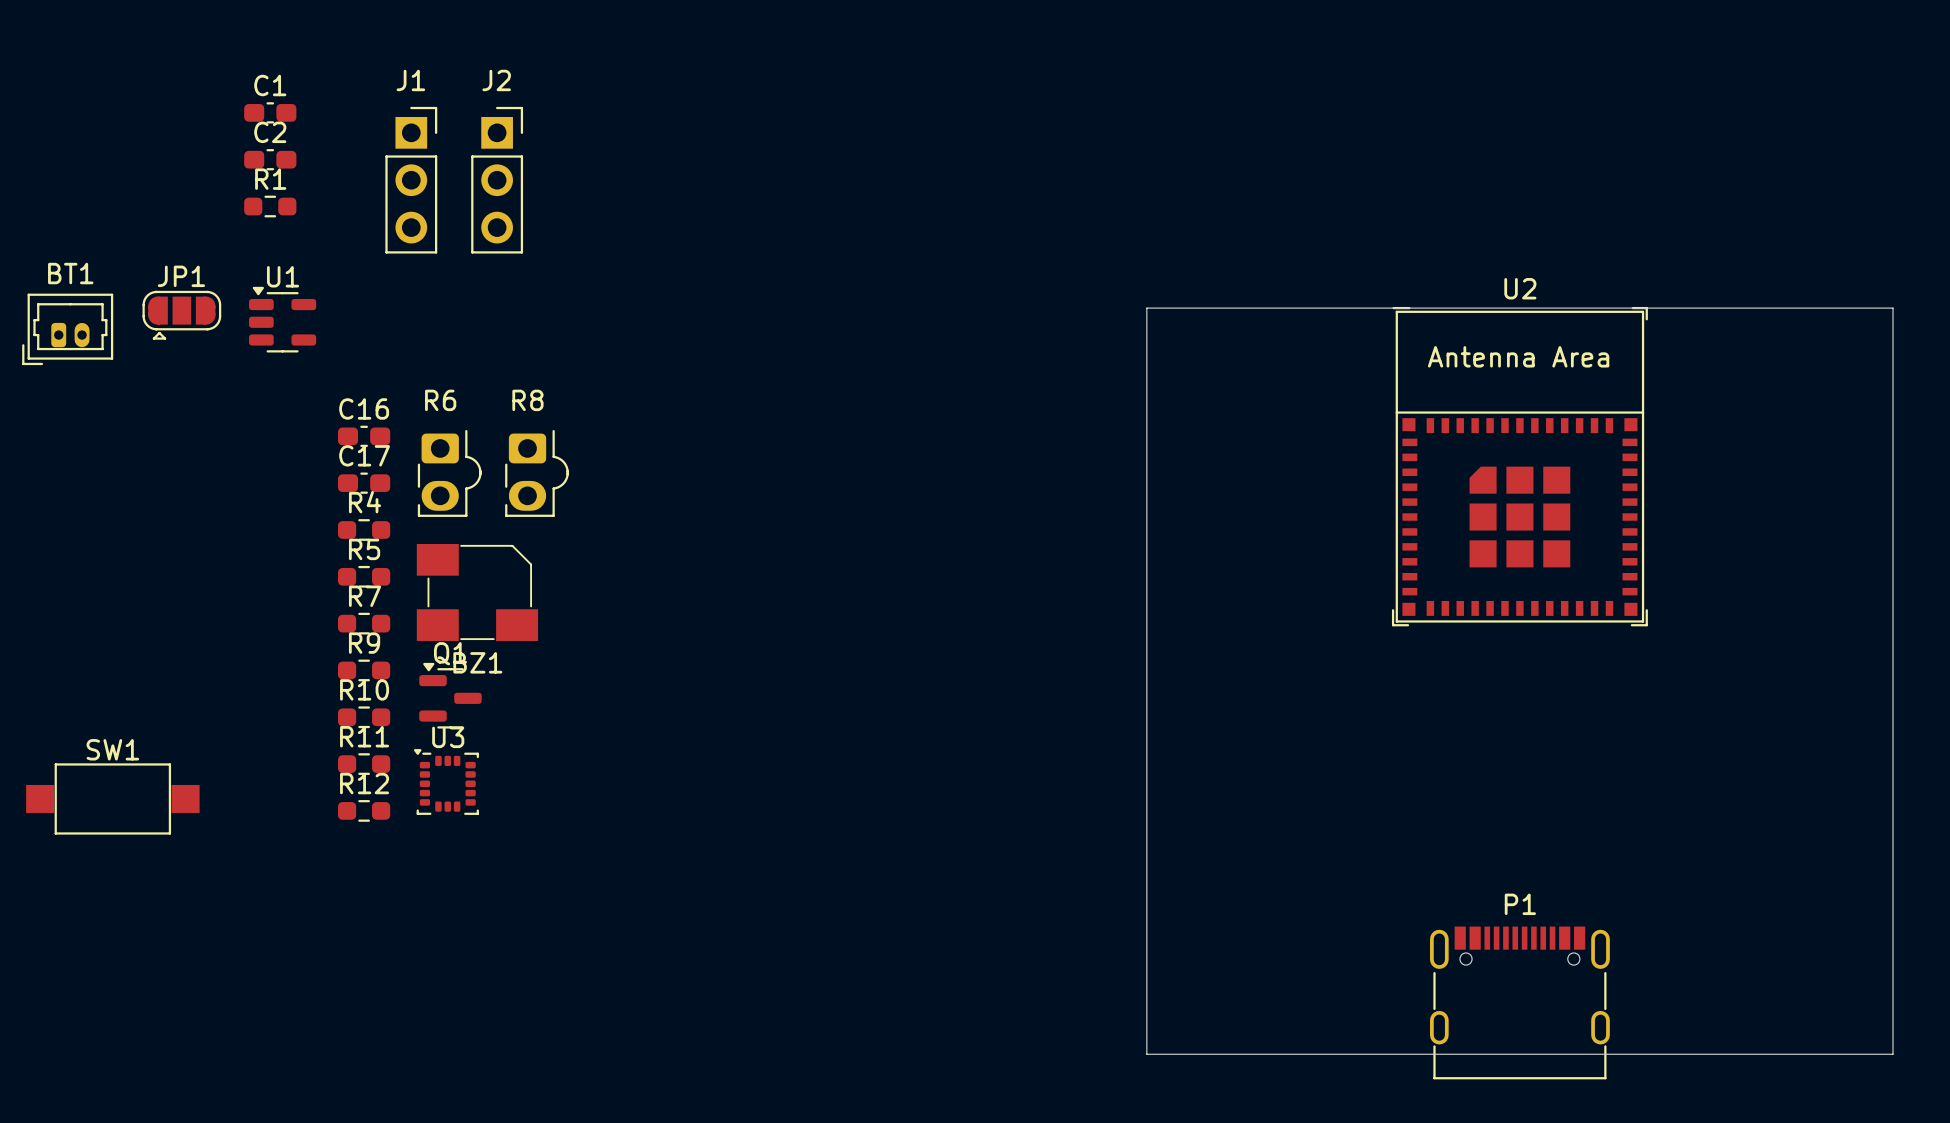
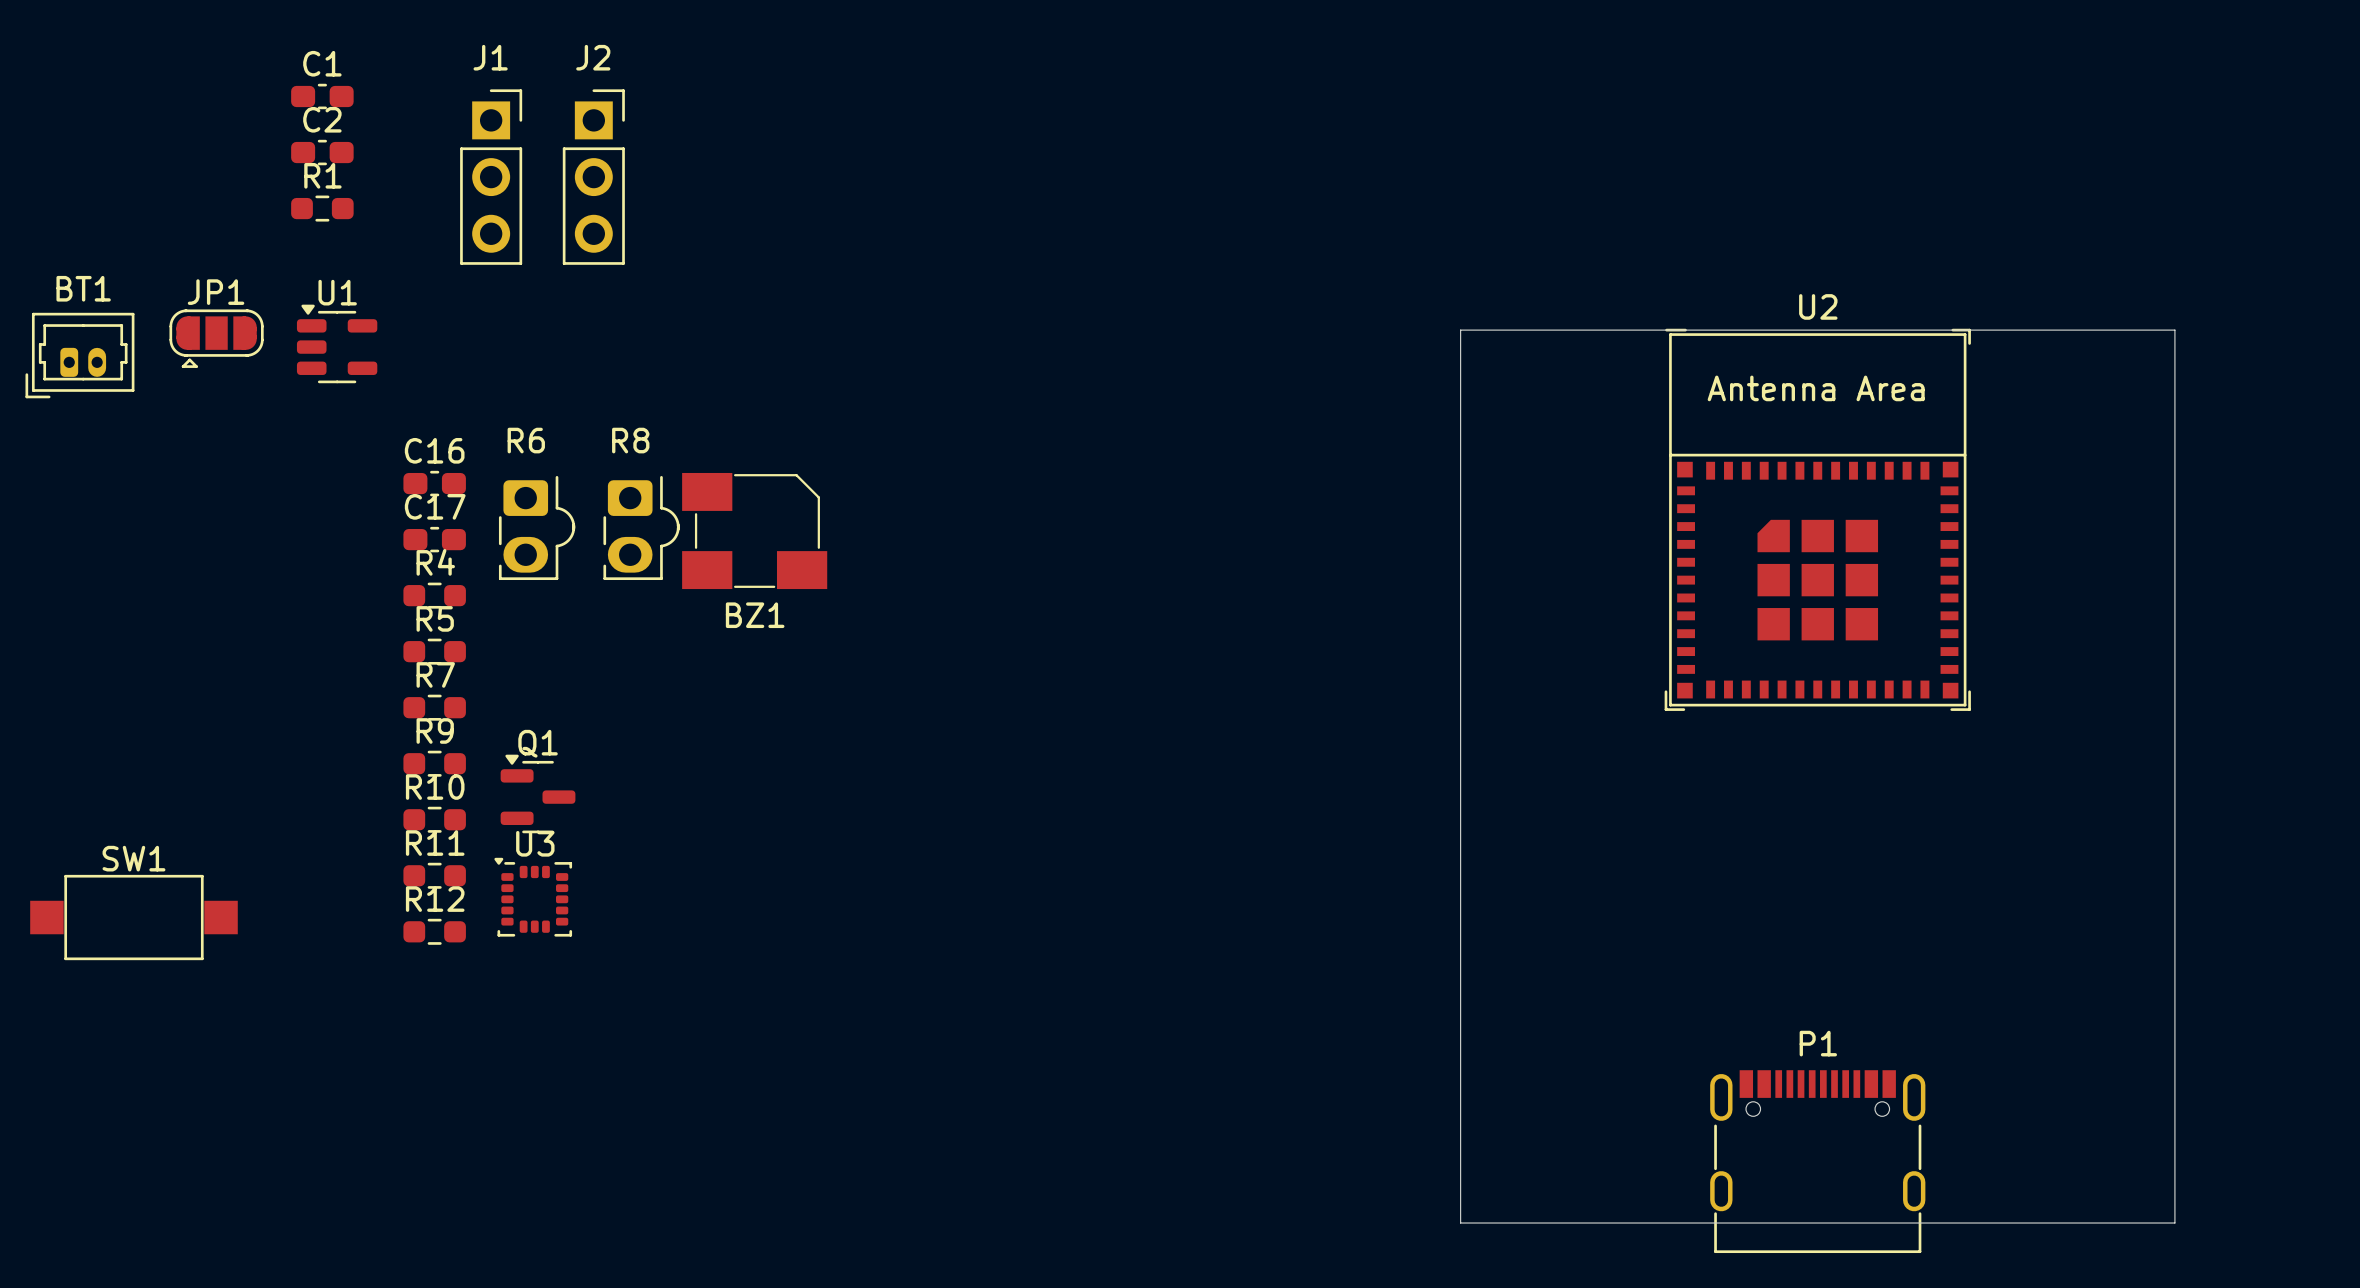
board edge: (1221, 308) (1146, 308) (1146, 1054) (1221, 1054) -> (1460, 330) (1460, 1223)
board edge: (1818, 308) (1893, 308) (1893, 1054) (1818, 1054) -> (2174, 330) (2174, 1223)
BZ1 position: (477, 592) -> (754, 531)

